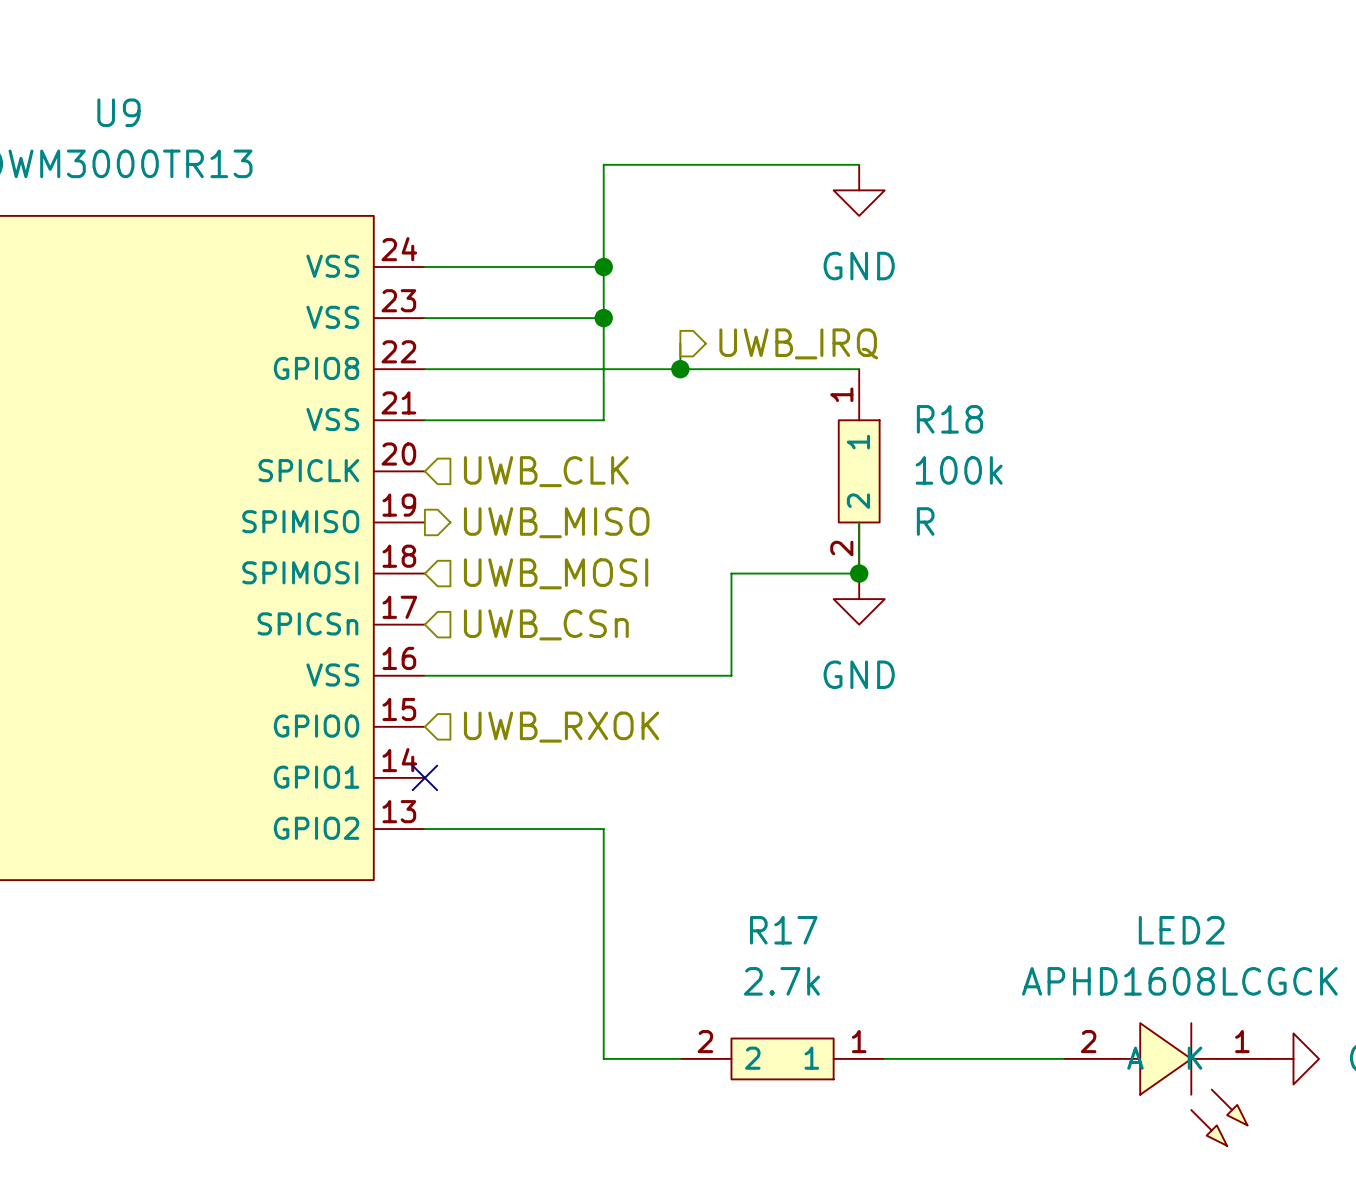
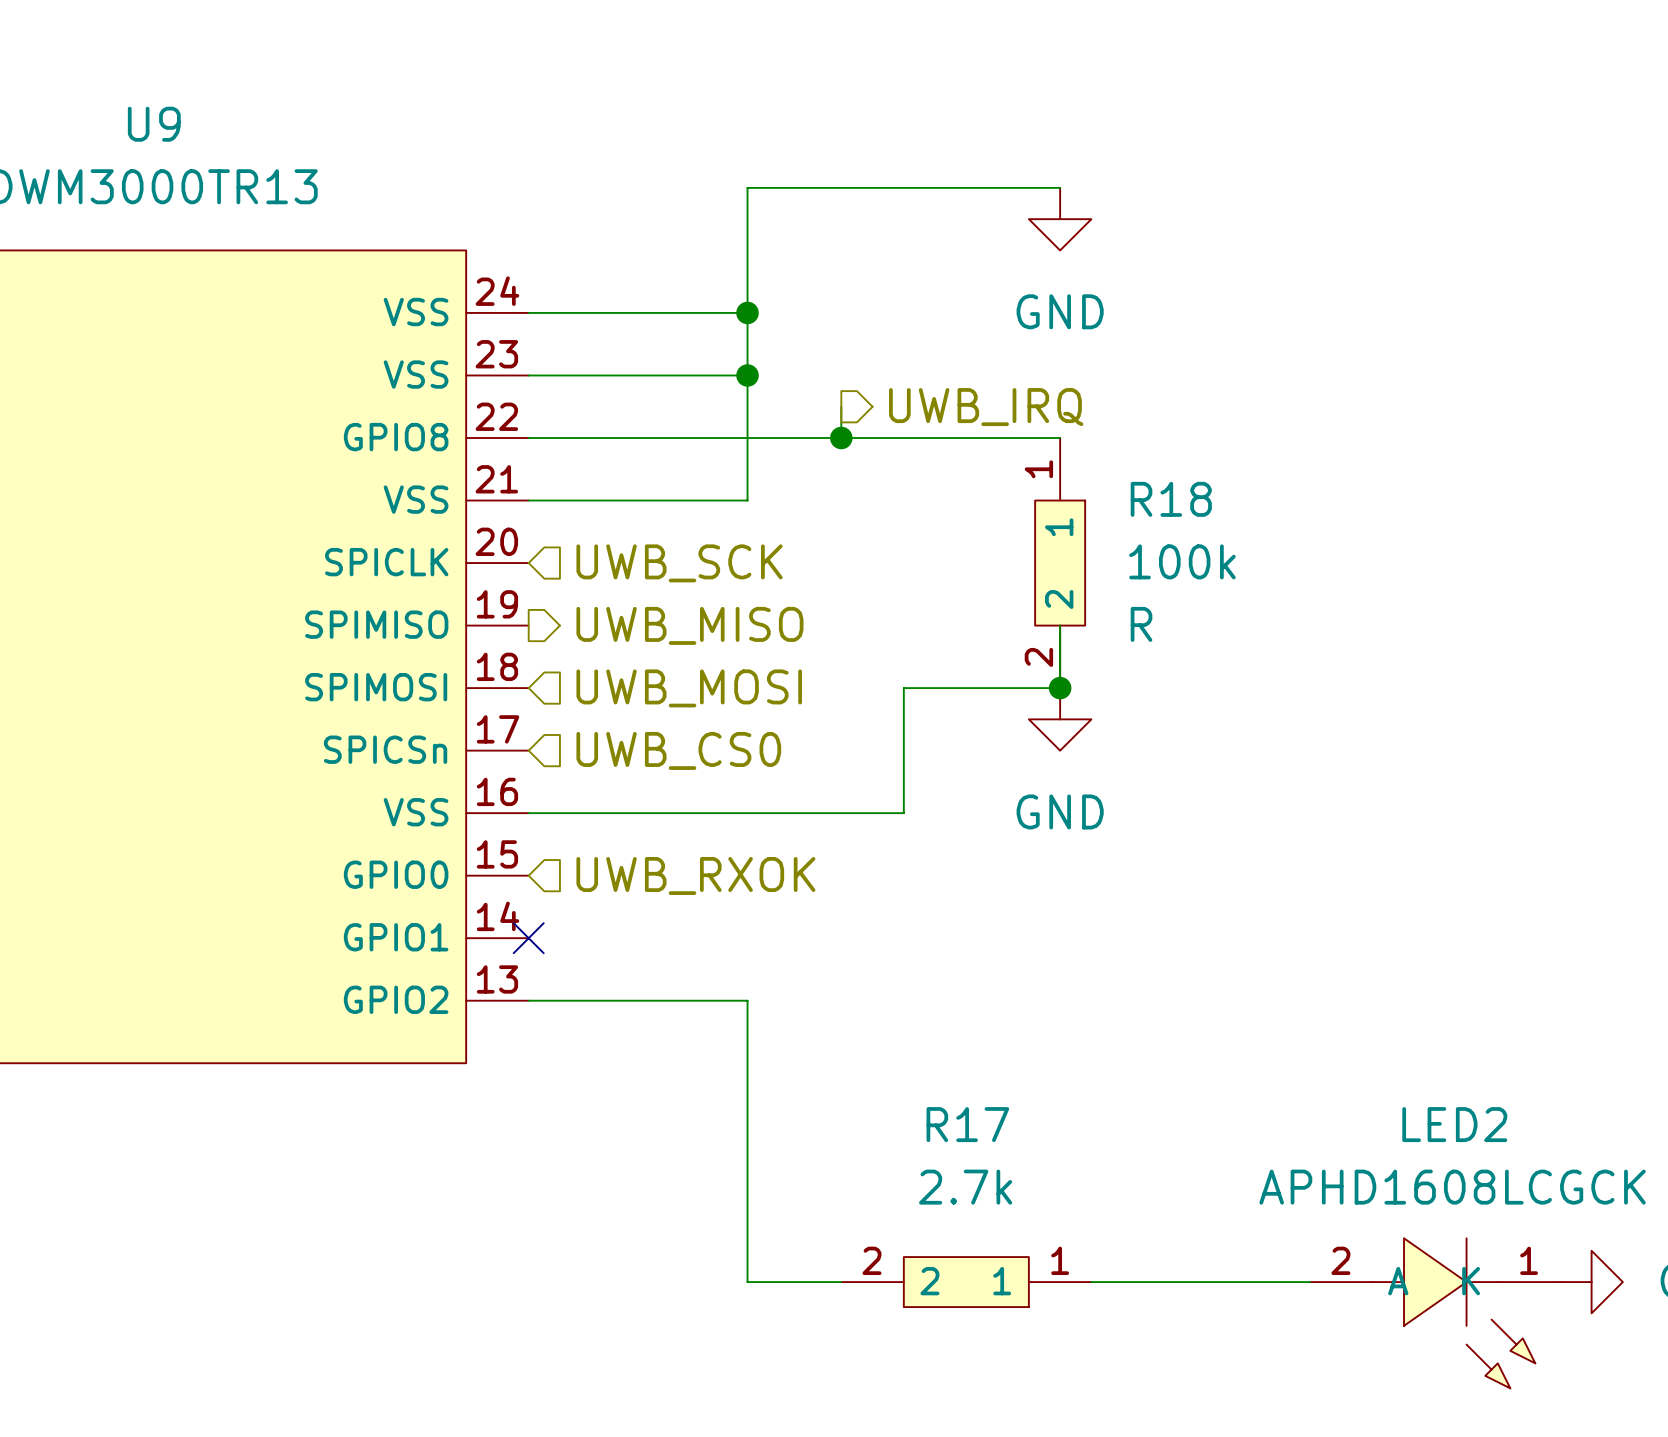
hierarchical label: UWB_CLK (546, 471) -> UWB_SCK (679, 563)
hierarchical label: UWB_CSn (546, 624) -> UWB_CS0 (678, 750)

